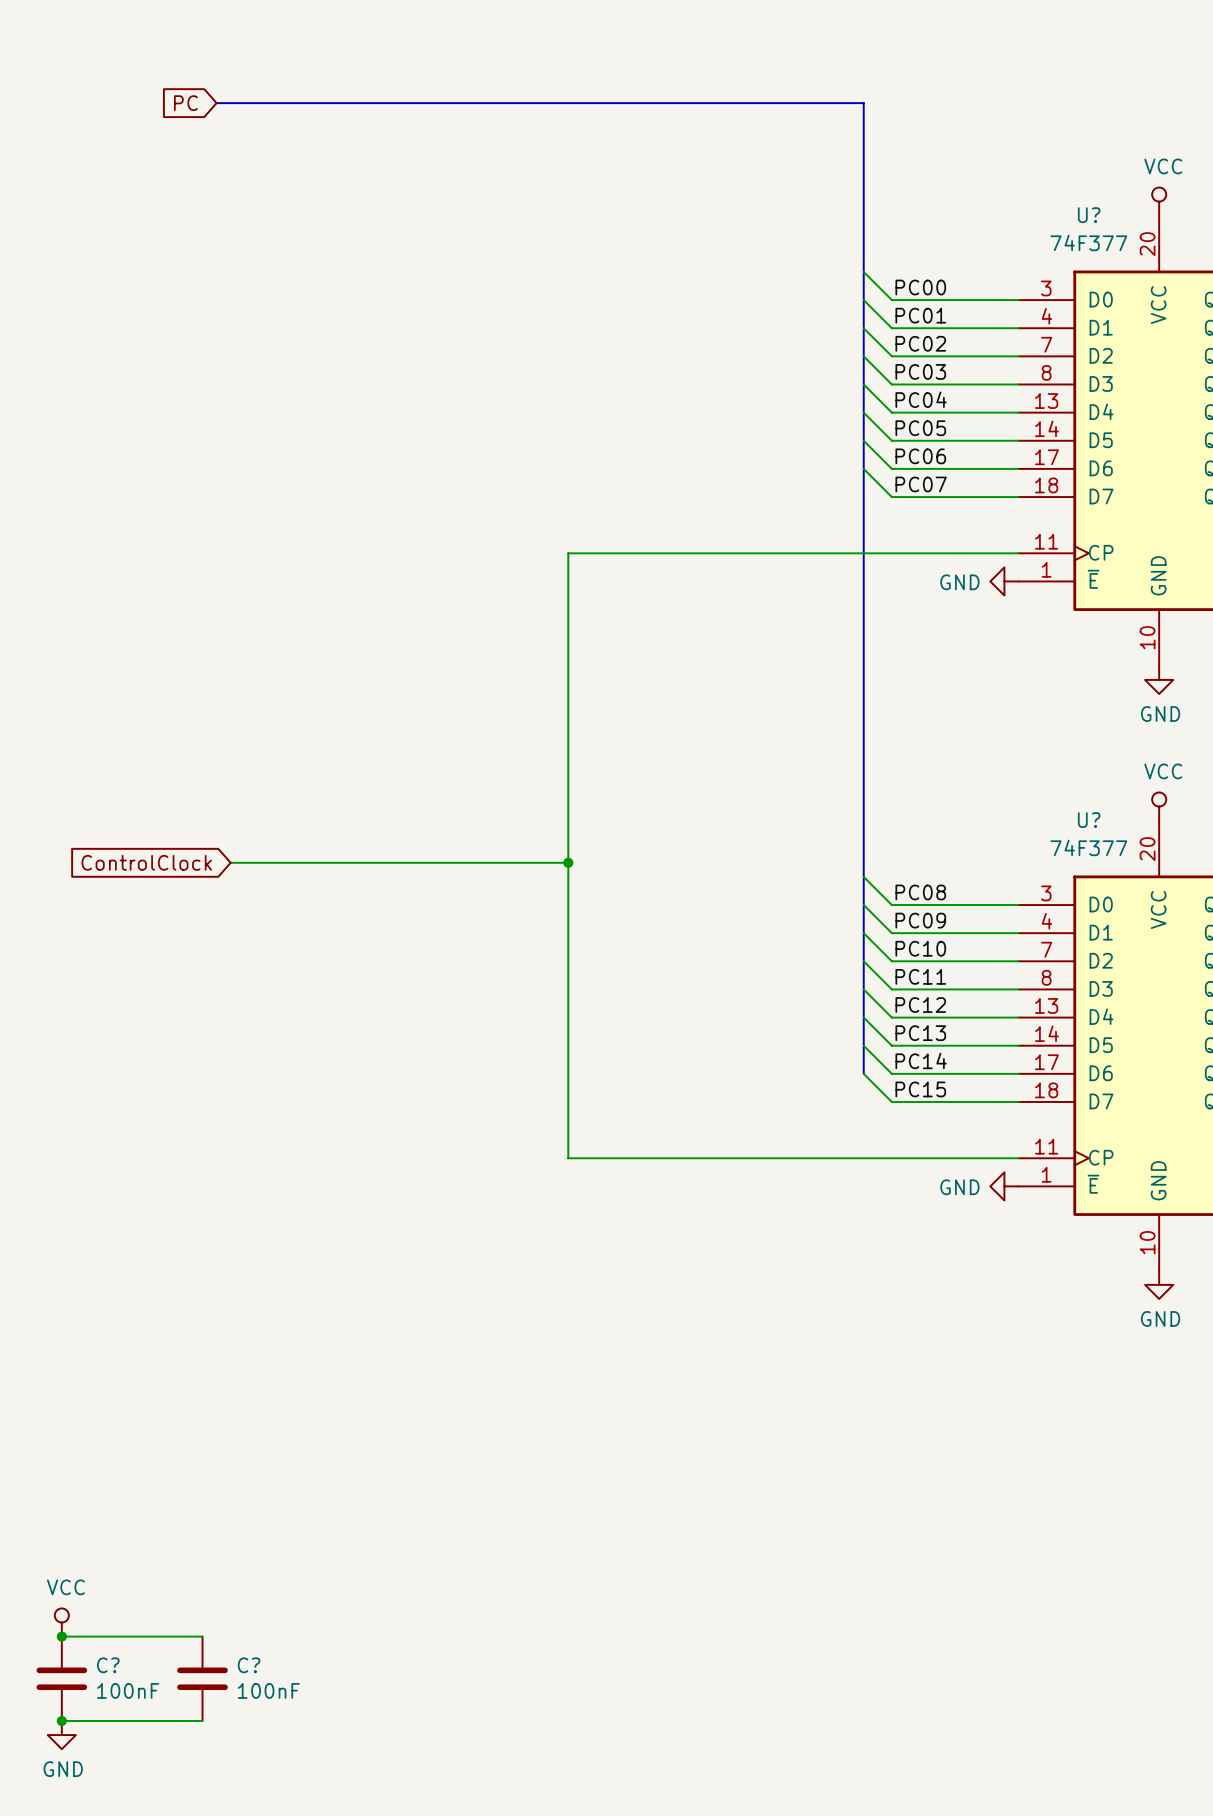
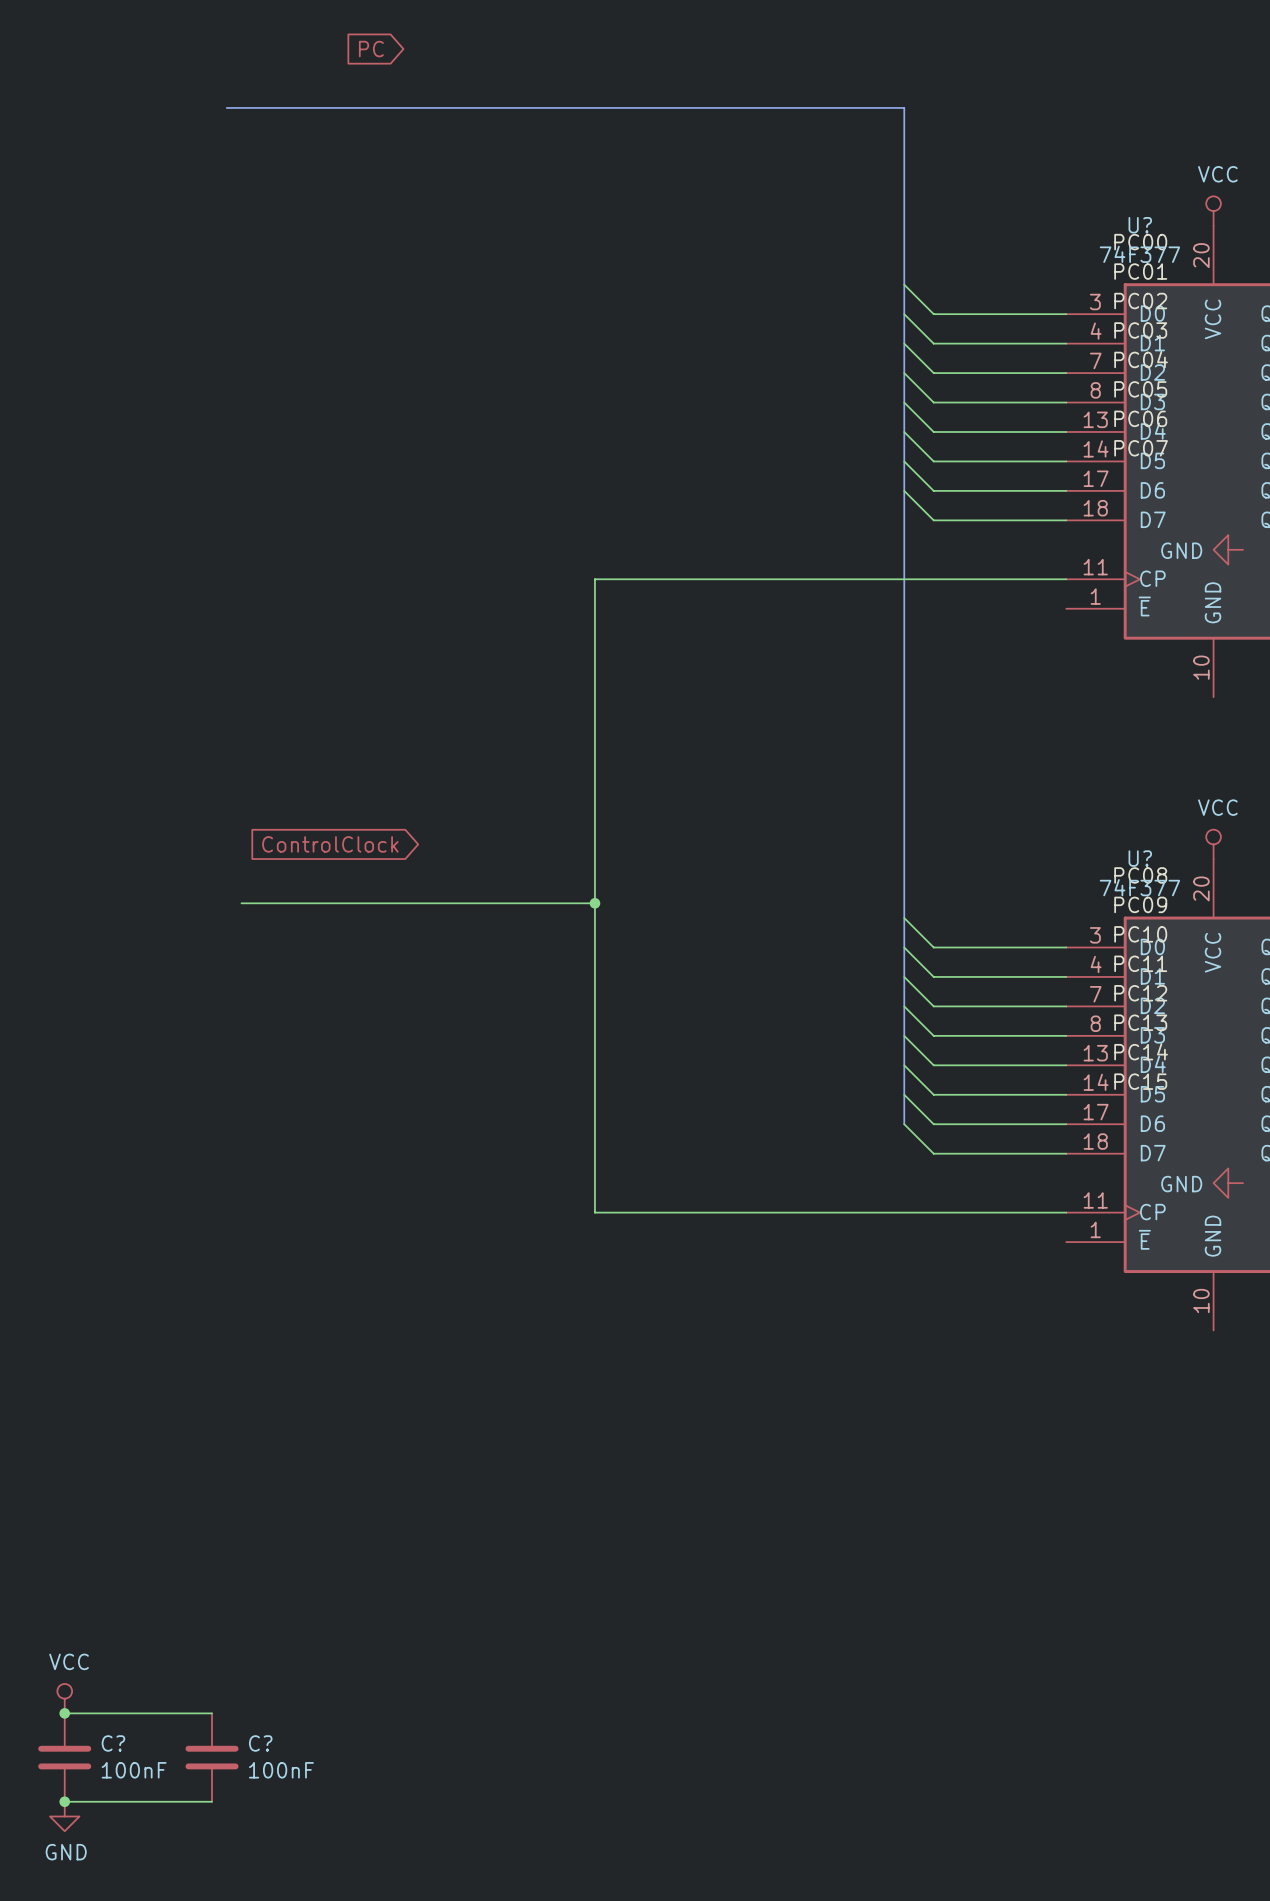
global label position: PC (185, 103) -> PC (371, 49)
label position: PC00 (920, 287) -> PC00 (1140, 242)
label position: PC01 (920, 315) -> PC01 (1140, 271)
label position: PC02 (920, 343) -> PC02 (1140, 301)
label position: PC03 (920, 371) -> PC03 (1140, 330)
label position: PC04 (921, 399) -> PC04 (1141, 359)
label position: PC05 (920, 428) -> PC05 (1140, 389)
label position: PC06 (920, 456) -> PC06 (1140, 418)
label position: PC07 (921, 484) -> PC07 (1141, 448)
power symbol: none -> GND (1228, 549)
power symbol: GND (1004, 581) -> none
power symbol: GND (1159, 679) -> none
global label position: ControlClock (146, 862) -> ControlClock (330, 844)
label position: PC08 (920, 892) -> PC08 (1140, 875)
label position: PC09 (920, 920) -> PC09 (1140, 904)
label position: PC10 (920, 948) -> PC10 (1140, 934)
label position: PC11 (920, 976) -> PC11 (1140, 963)
label position: PC12 (920, 1005) -> PC12 (1140, 993)
label position: PC13 (920, 1033) -> PC13 (1140, 1022)
label position: PC14 (921, 1060) -> PC14 (1141, 1051)
label position: PC15 (920, 1089) -> PC15 (1140, 1081)
power symbol: none -> GND (1228, 1183)
power symbol: GND (1004, 1186) -> none
power symbol: GND (1159, 1284) -> none

